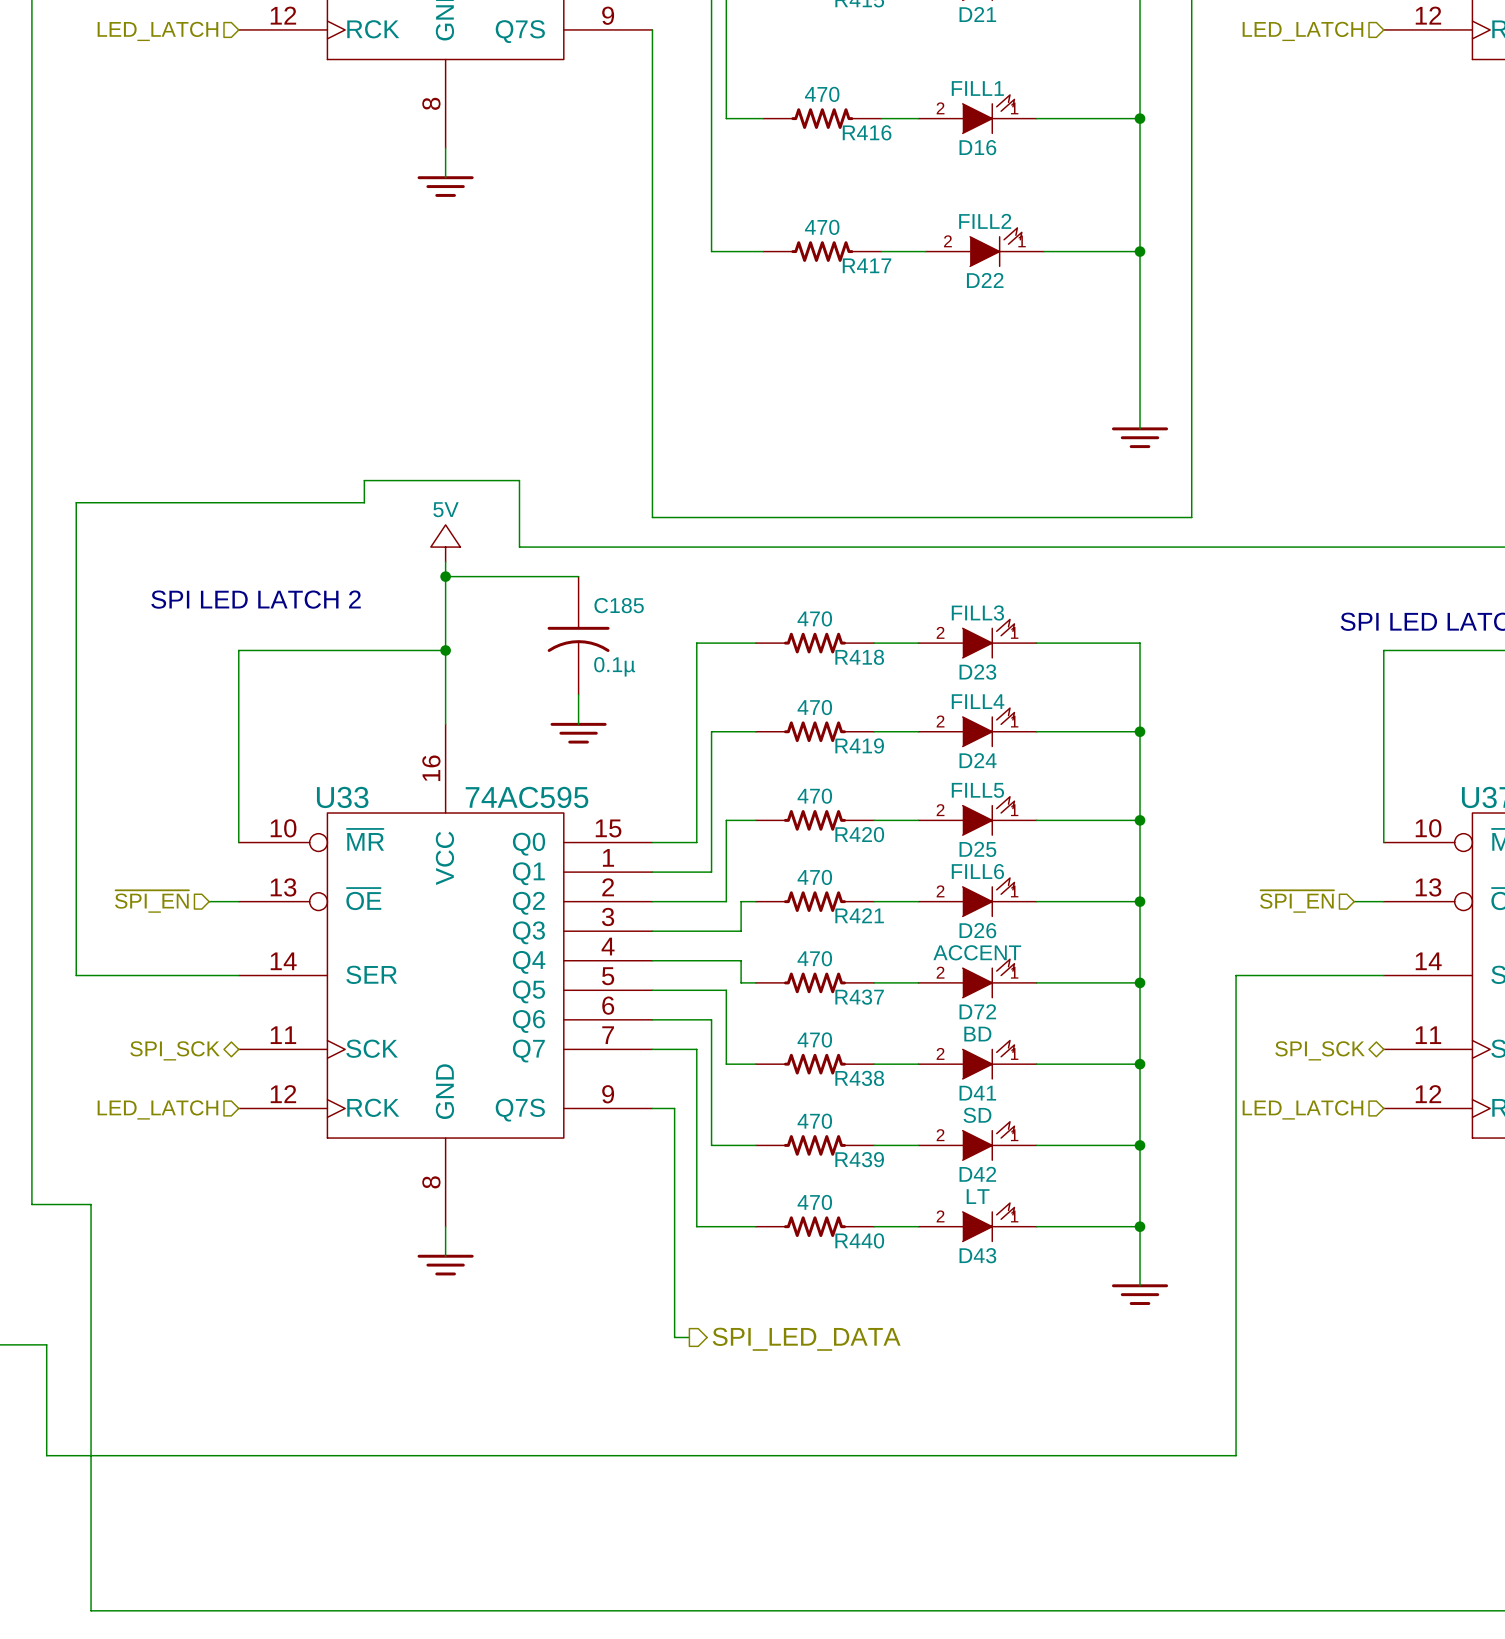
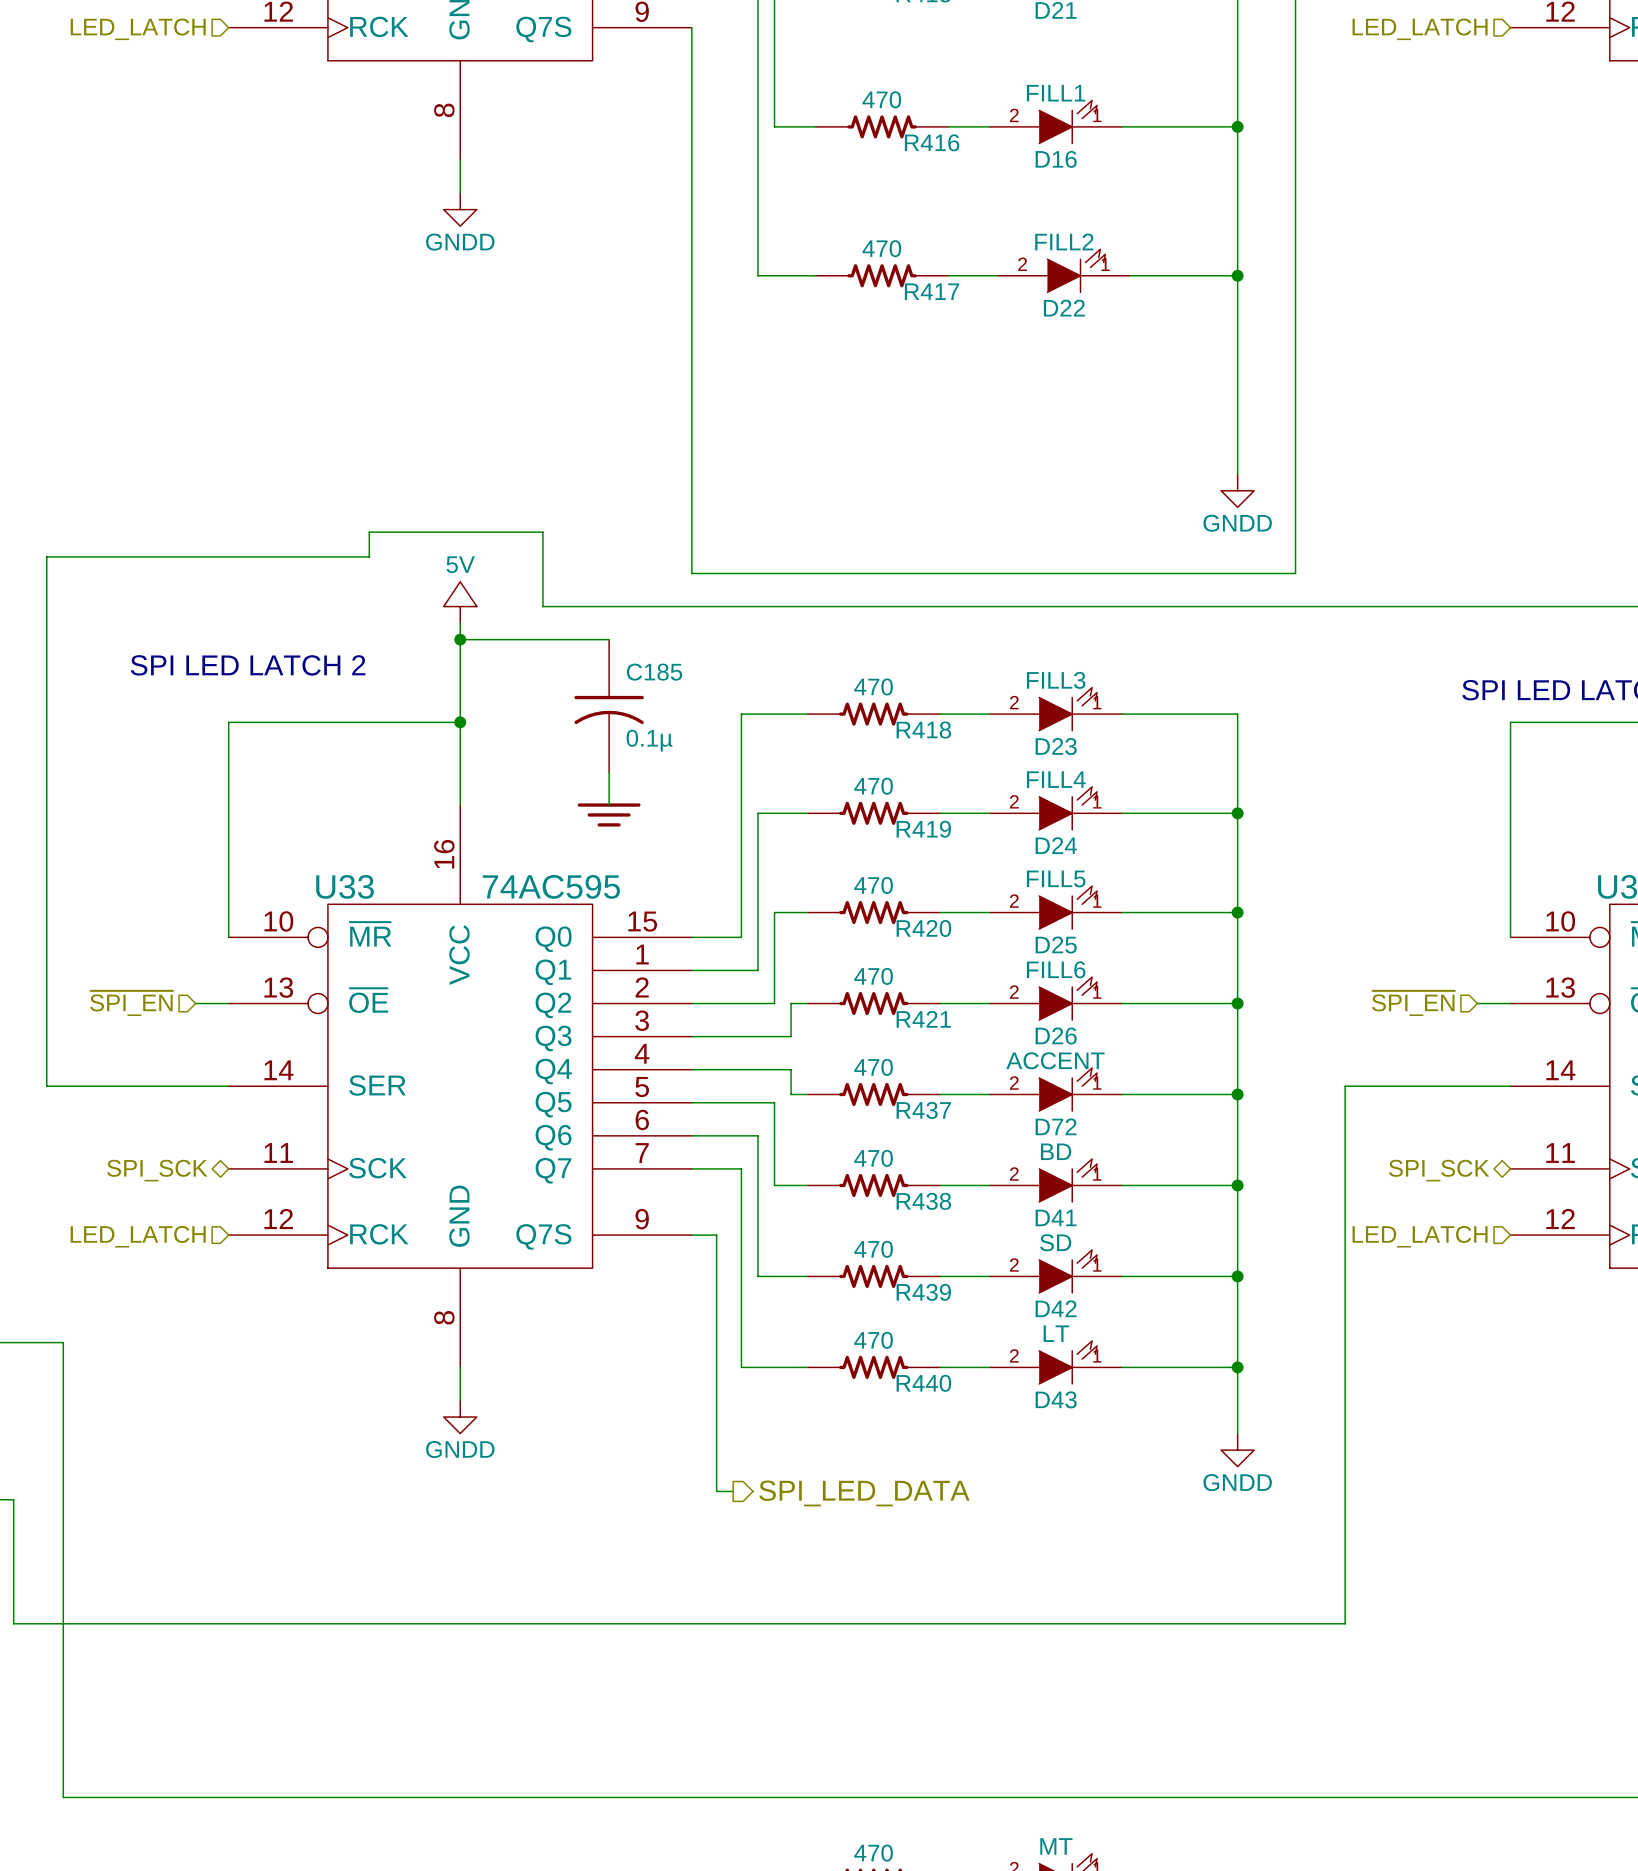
power symbol shape: [417, 176, 474, 197] -> [443, 193, 477, 227]
power symbol text: none -> GNDD (460, 242)
power symbol shape: [1111, 427, 1169, 449] -> [1221, 474, 1255, 508]
power symbol text: none -> GNDD (1237, 523)
power symbol shape: [417, 1254, 474, 1276] -> [443, 1400, 477, 1434]
power symbol shape: [1111, 1284, 1169, 1305] -> [1221, 1433, 1255, 1467]
power symbol text: none -> GNDD (460, 1449)
power symbol text: none -> GNDD (1237, 1482)

